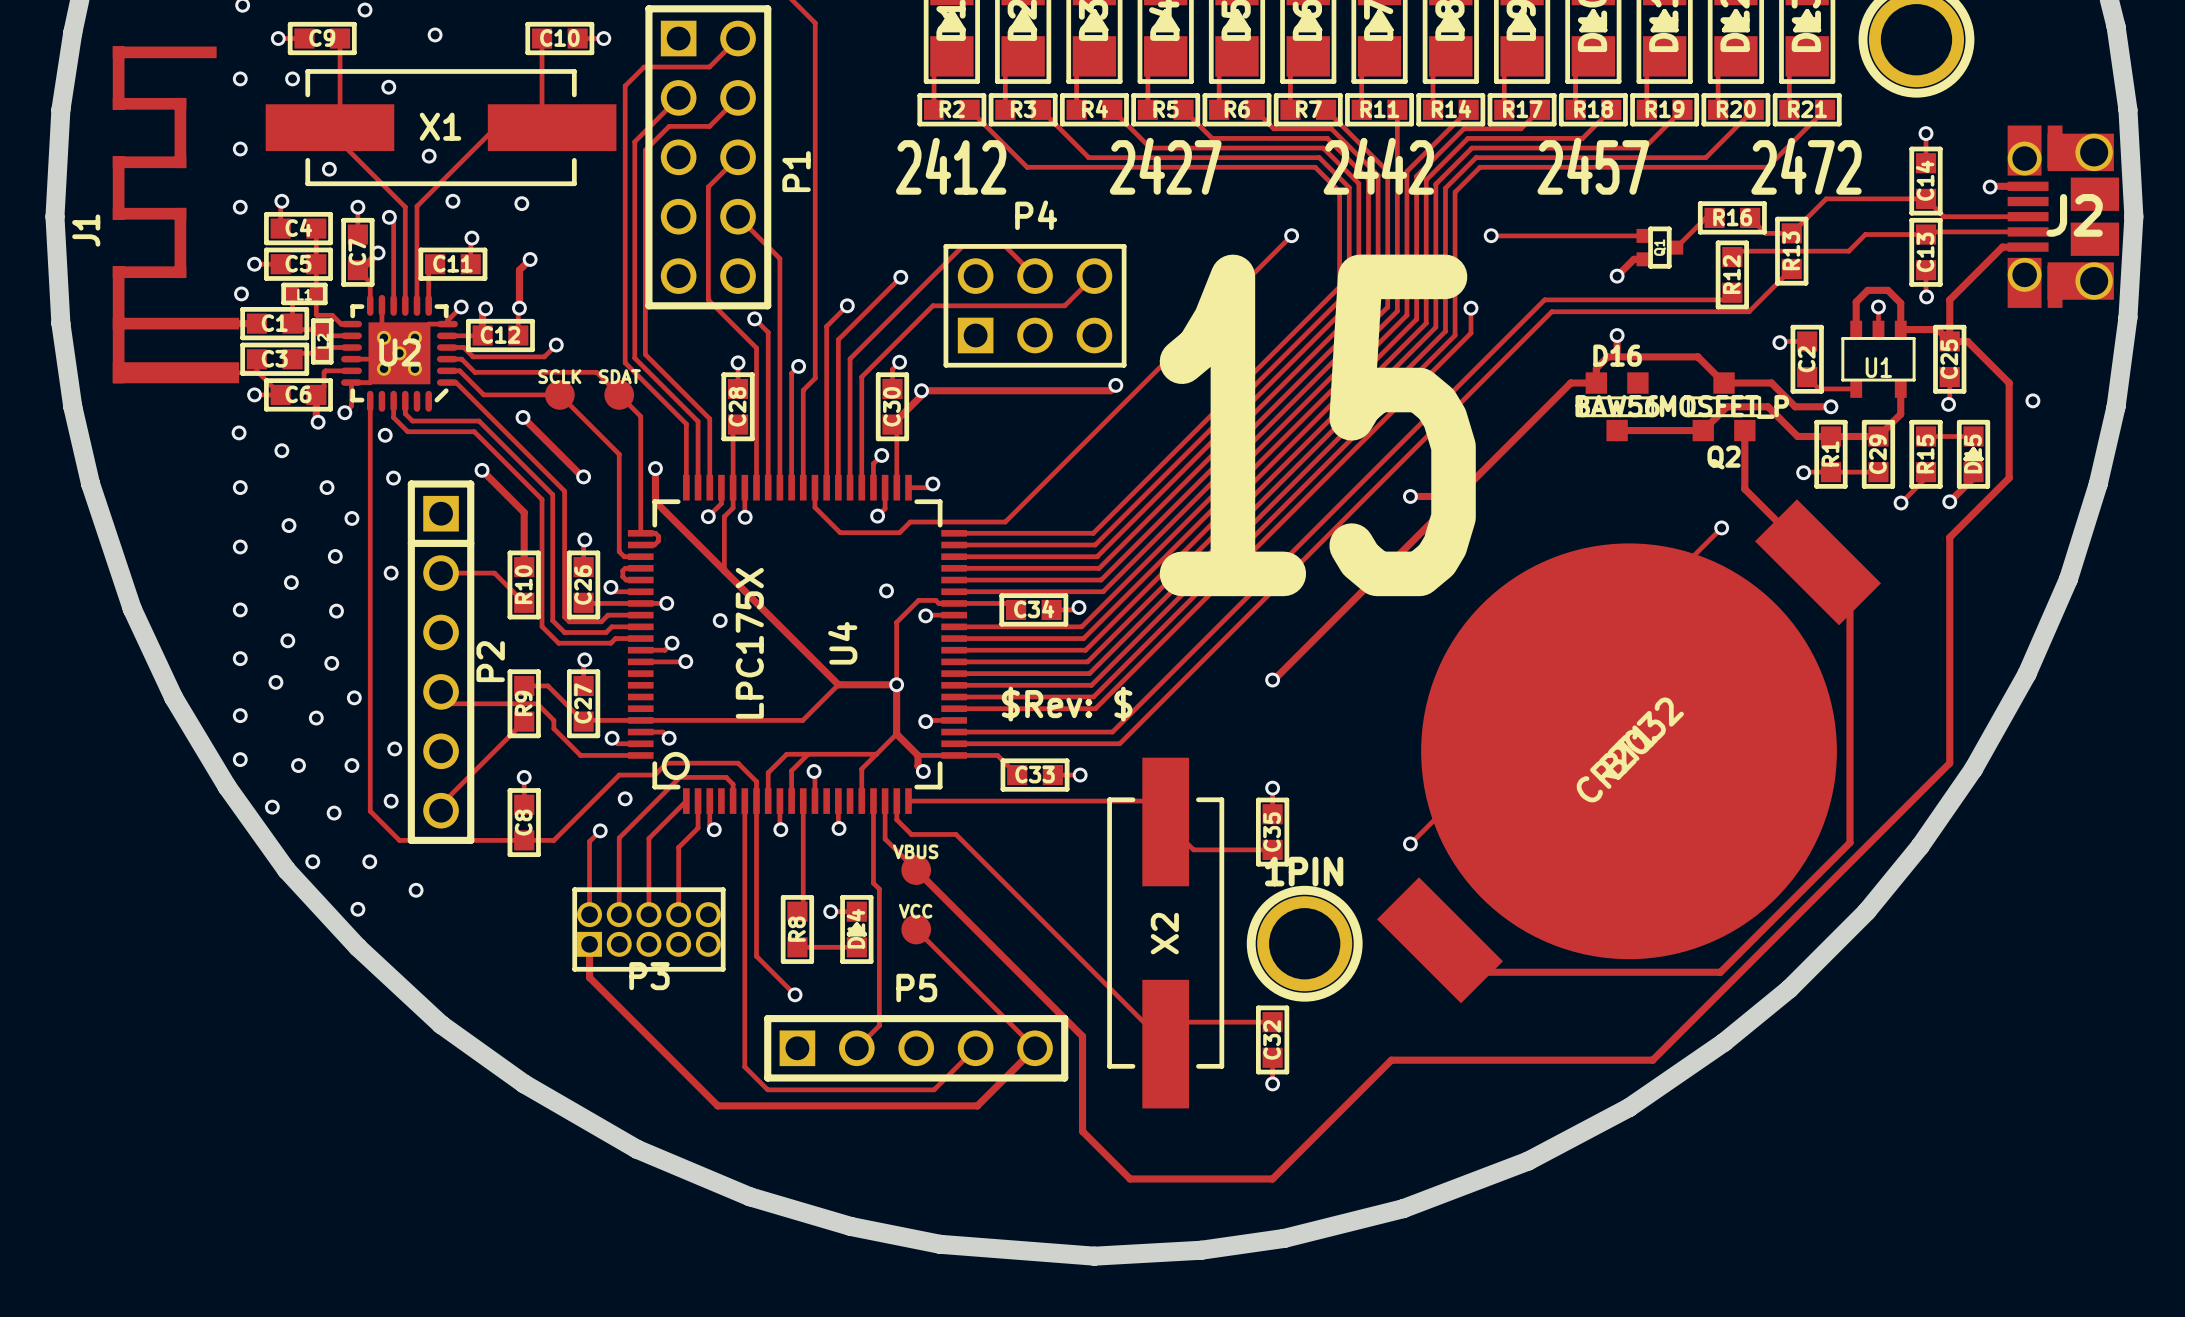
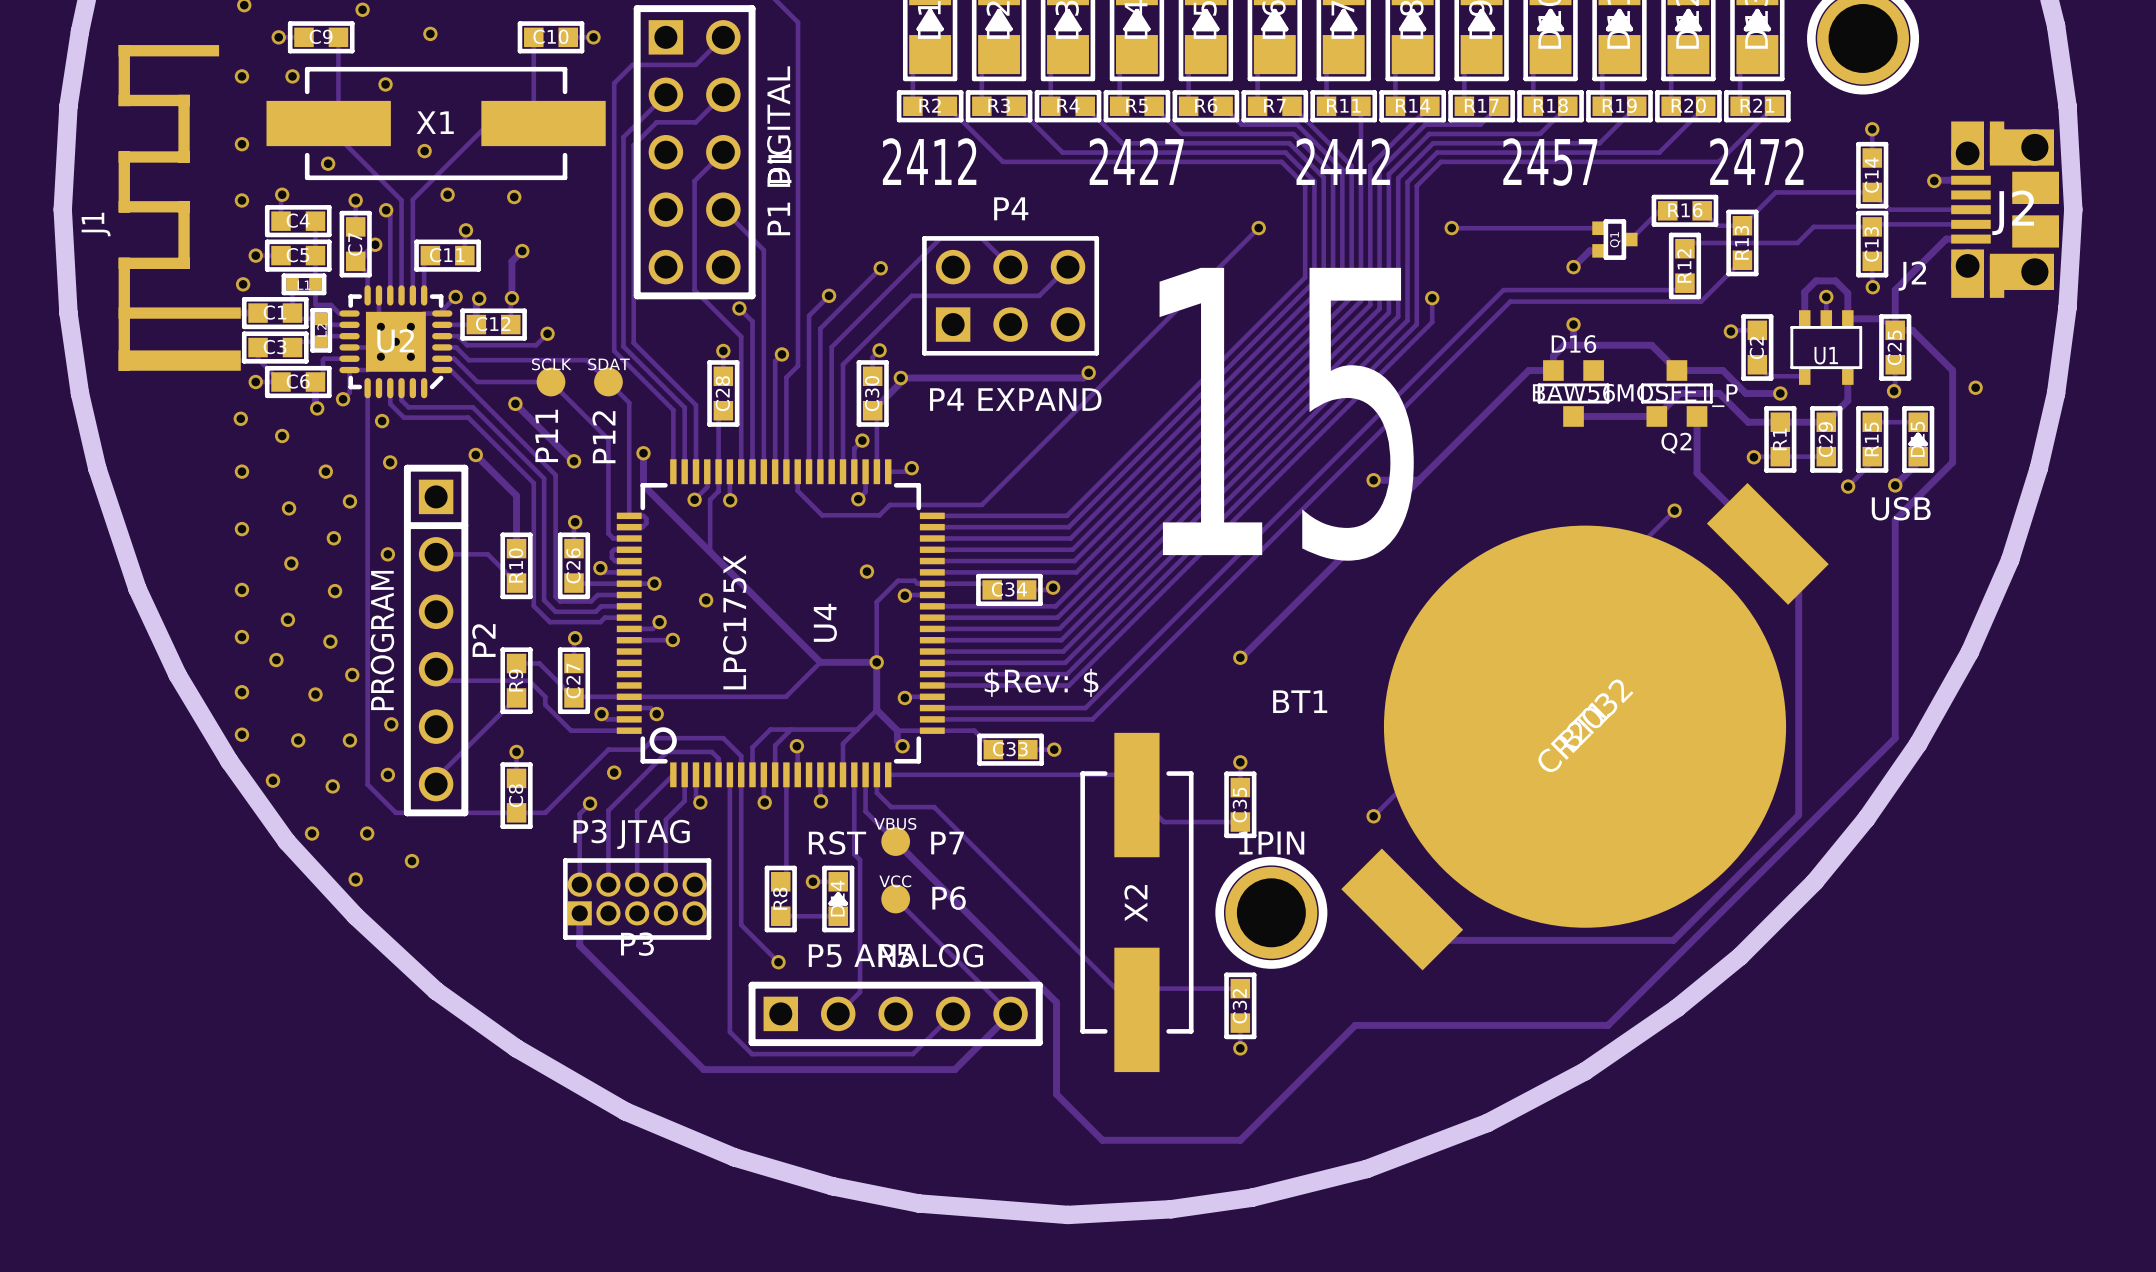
text: none -> P1 DIGITAL (778, 150)
text: none -> J2 (1912, 276)
text: none -> P4 EXPAND (1015, 399)
text: none -> P11 (546, 435)
text: none -> P12 (603, 437)
text: none -> USB (1901, 508)
text: none -> PROGRAM (382, 640)
text: none -> BT1 (1300, 701)
text: none -> P3 JTAG (631, 834)
text: none -> RST (837, 843)
text: none -> P7 (947, 843)
text: none -> P6 (949, 898)
text: none -> P5 ANALOG (895, 955)

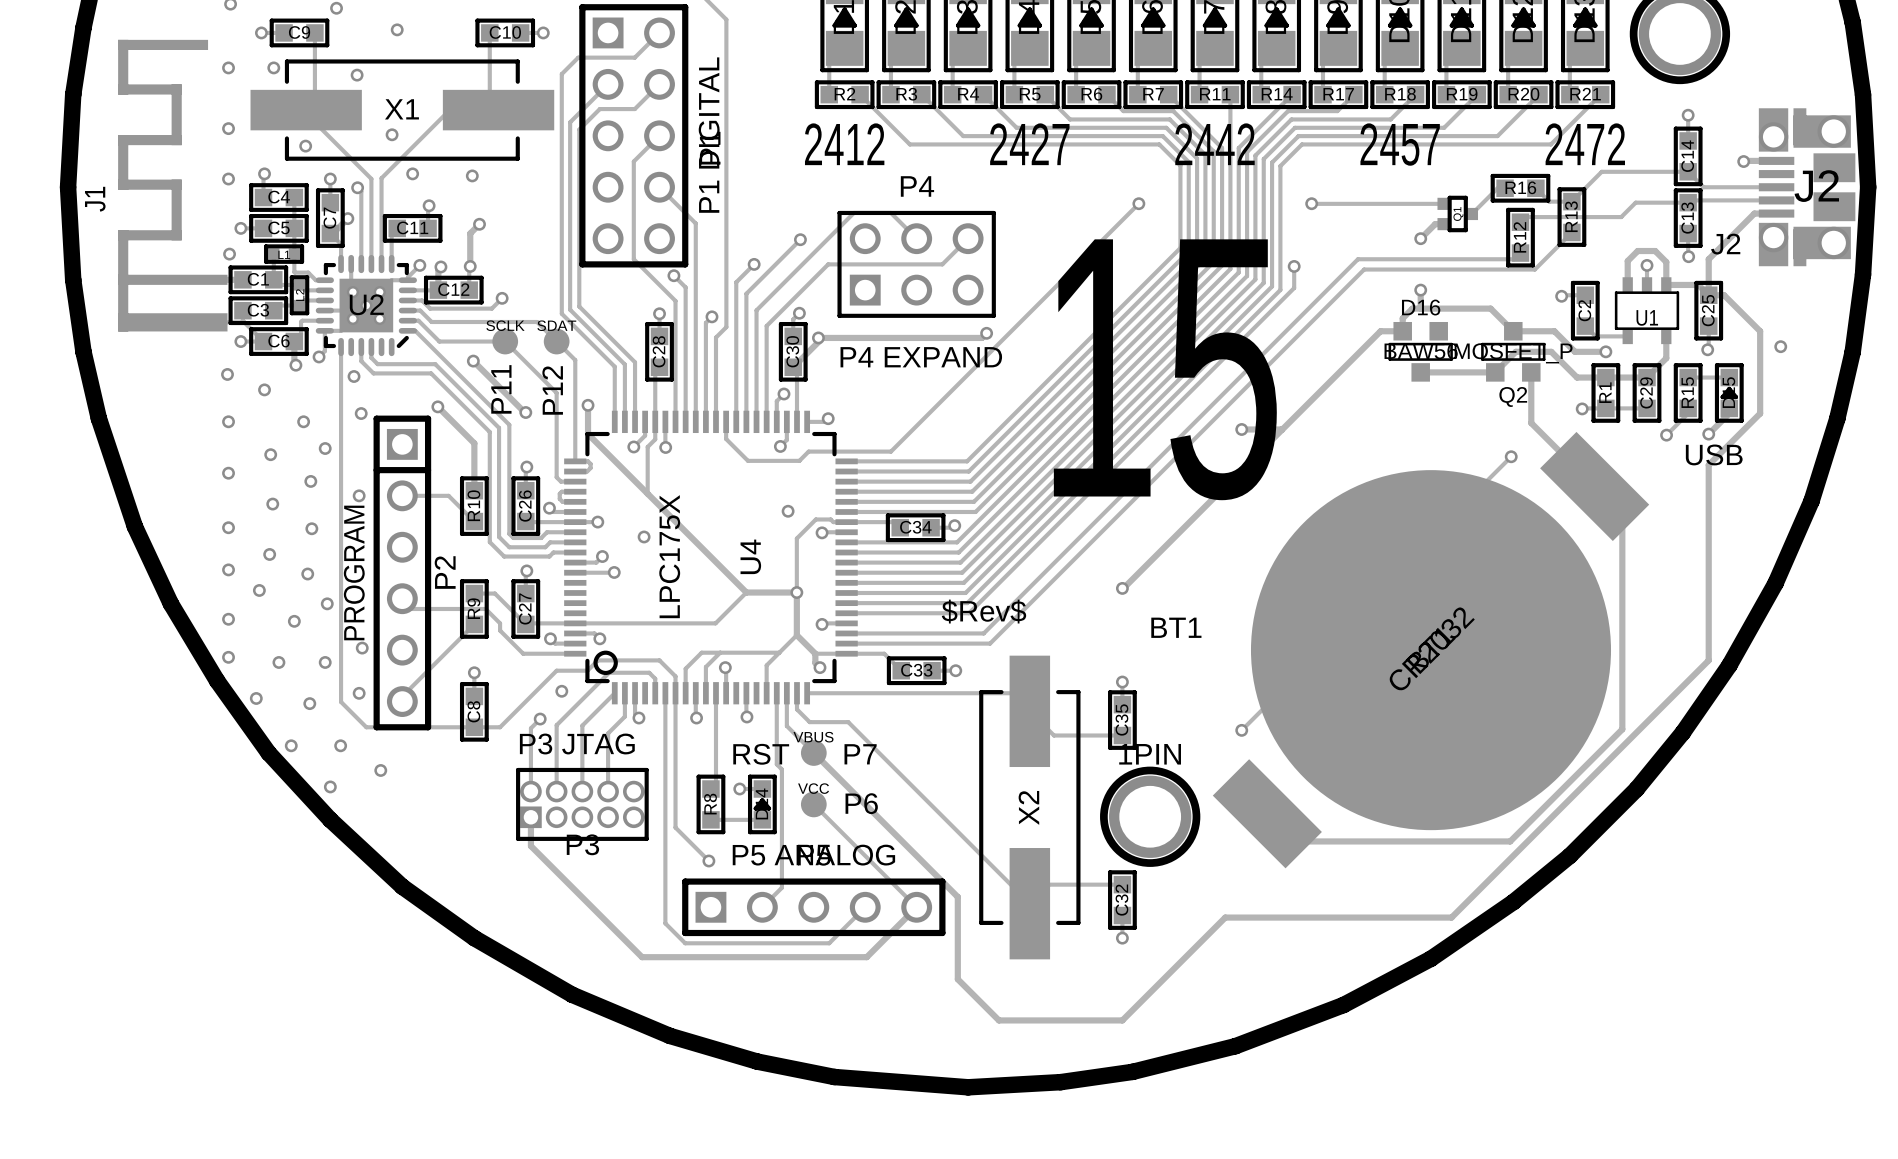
text: $Rev: $ (1041, 682) -> $Rev$ (983, 611)

